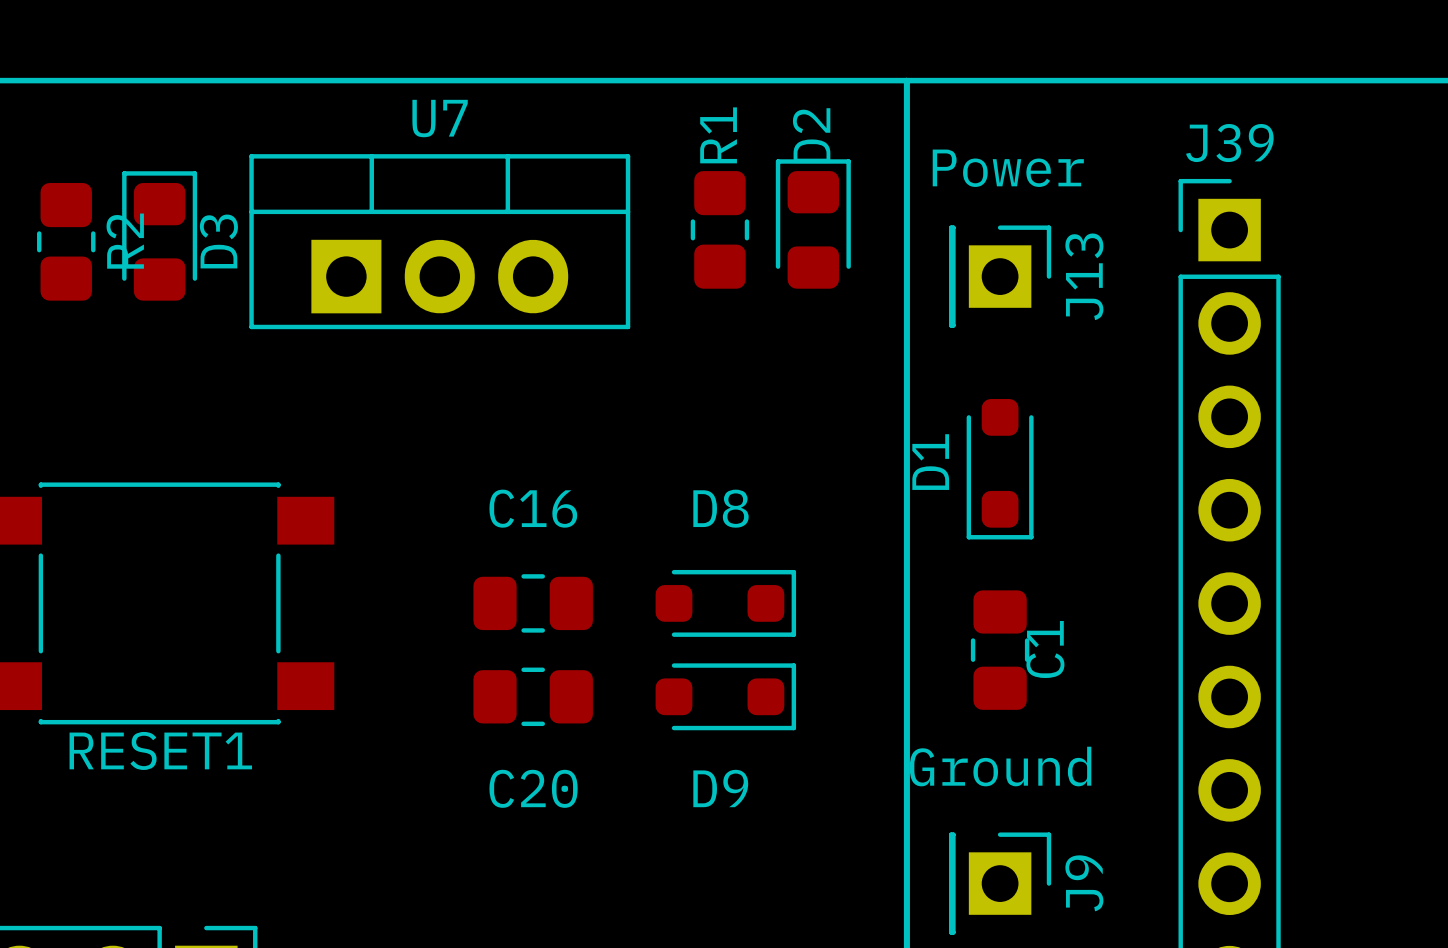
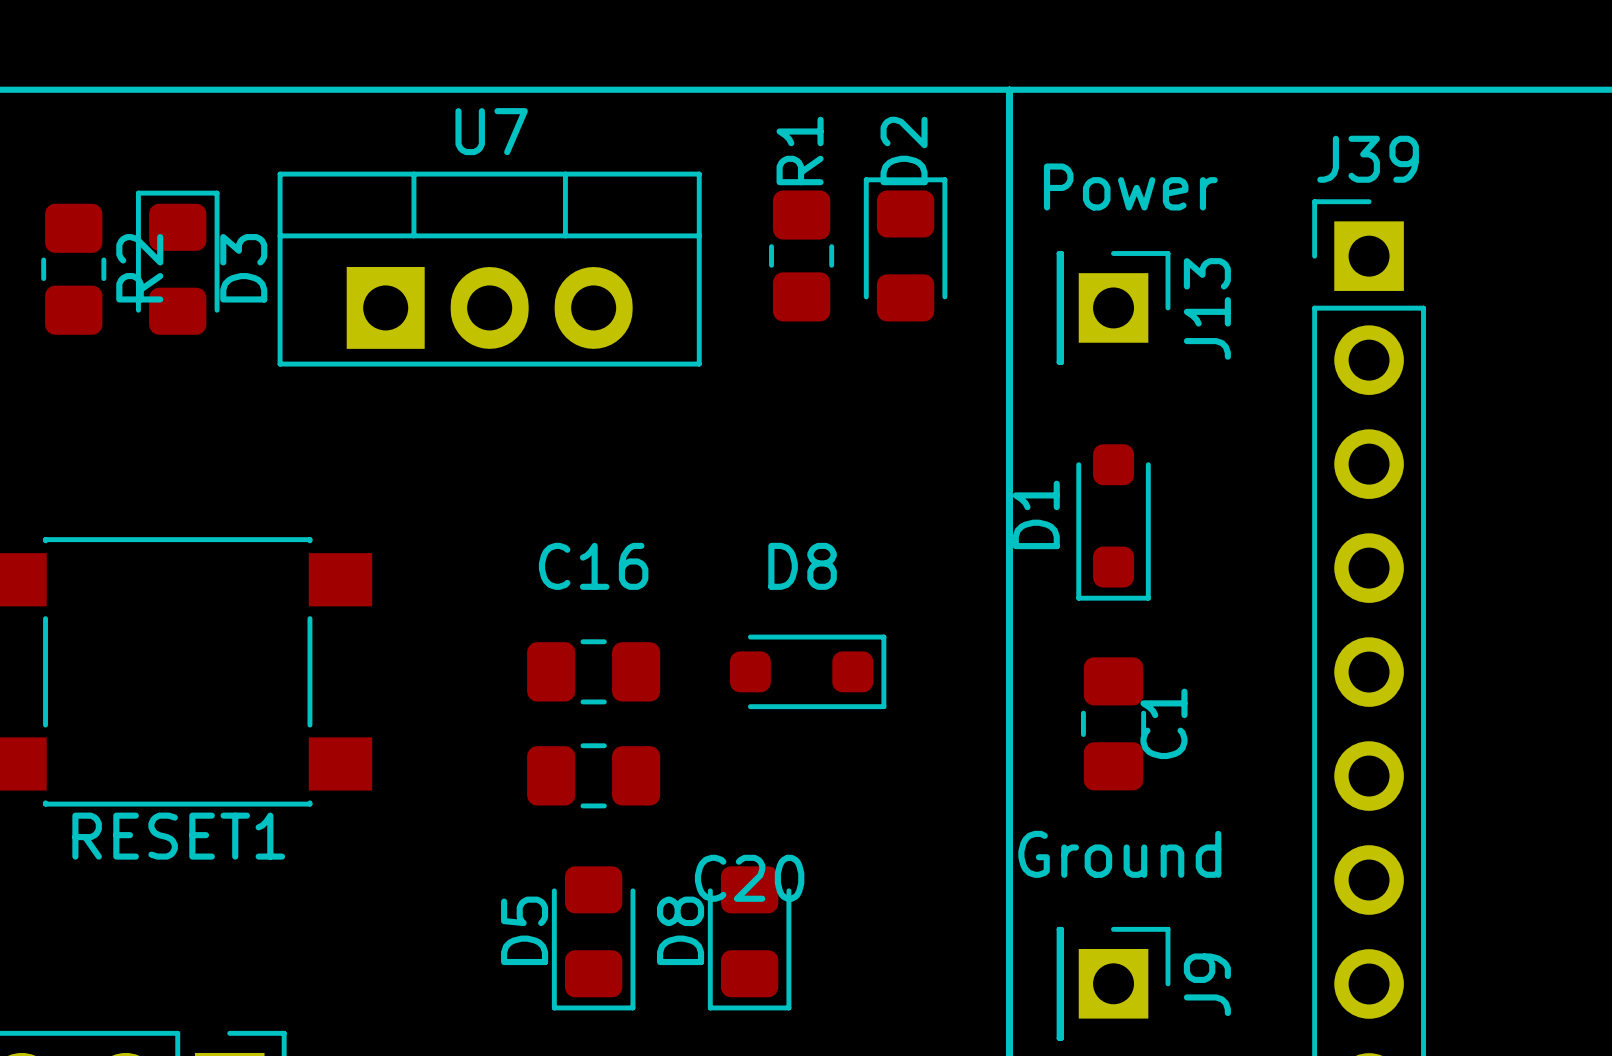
D9: (725, 696) -> none
C20 name position: C20 (533, 788) -> C20 (749, 878)
D5: none -> (593, 938)
D8: none -> (749, 938)

